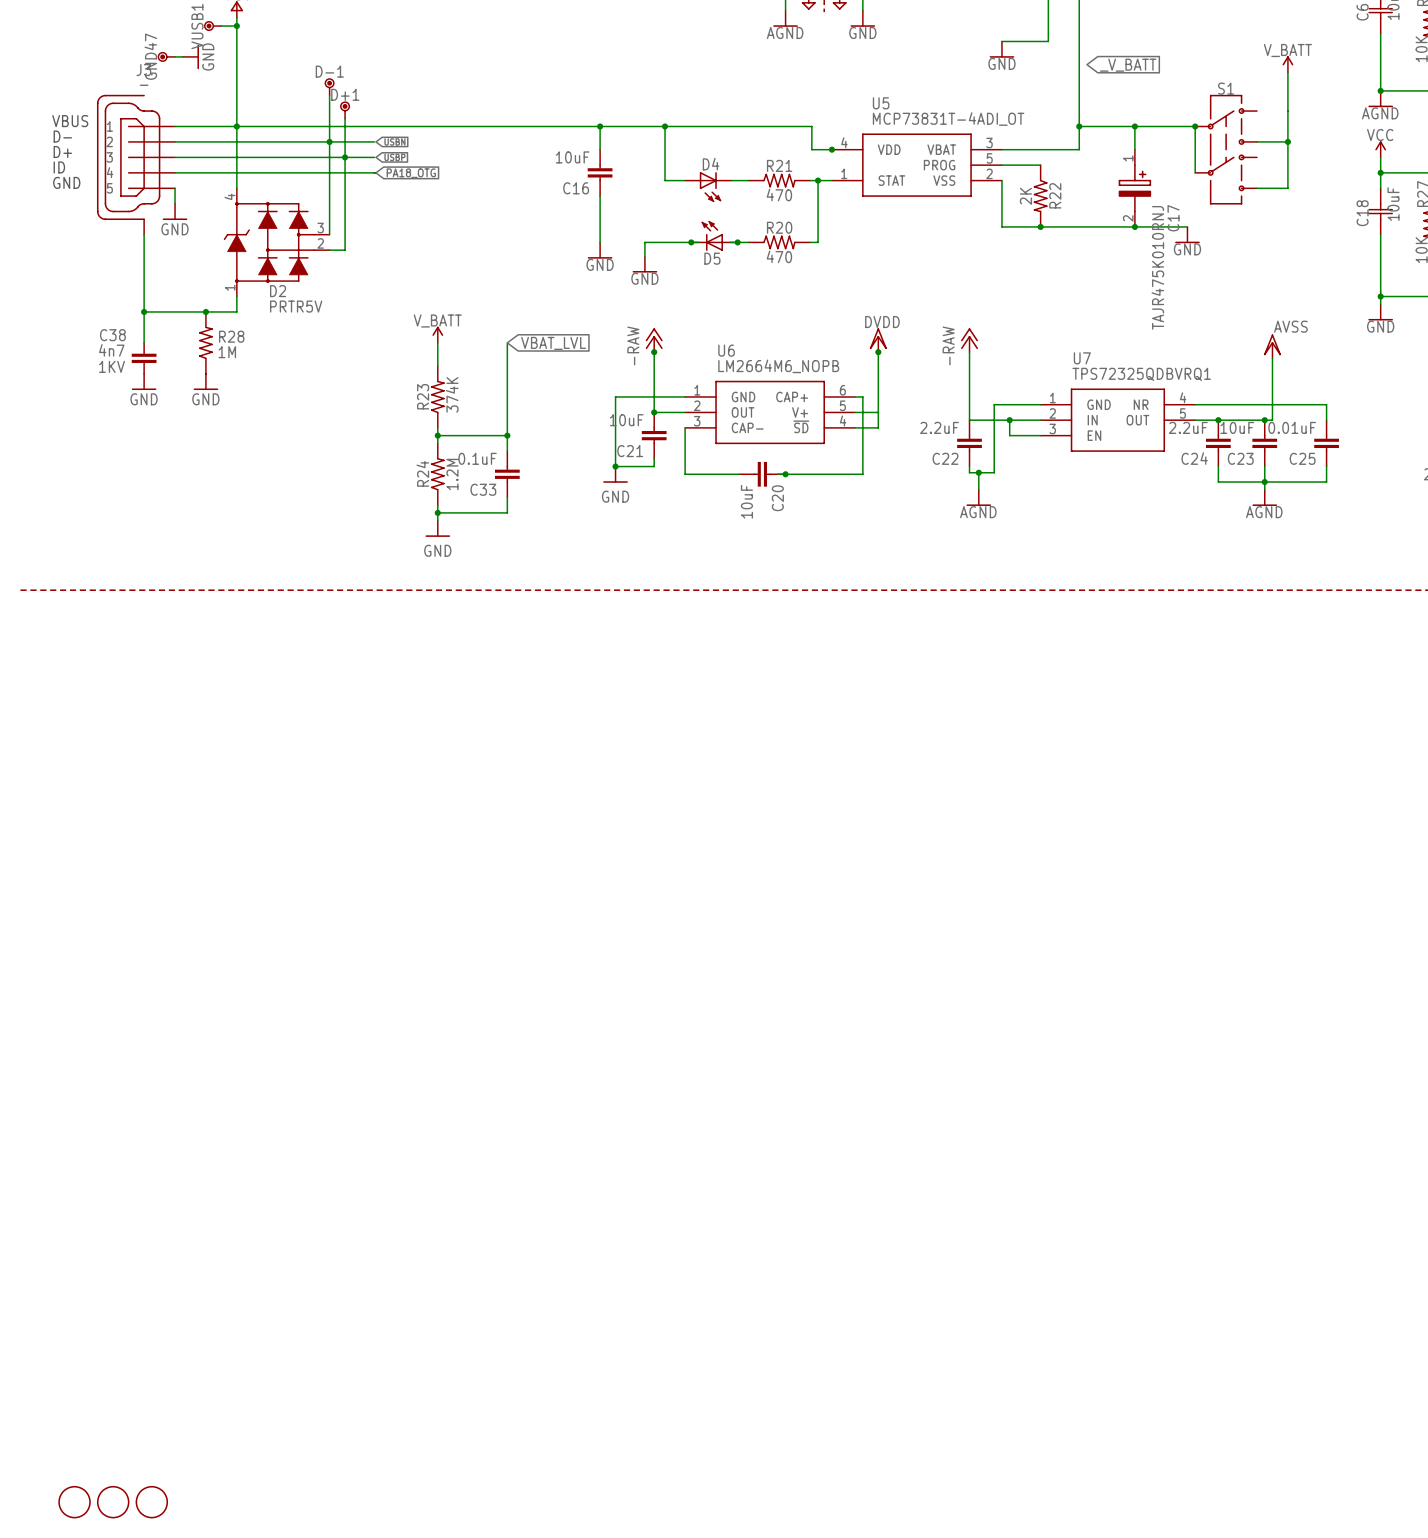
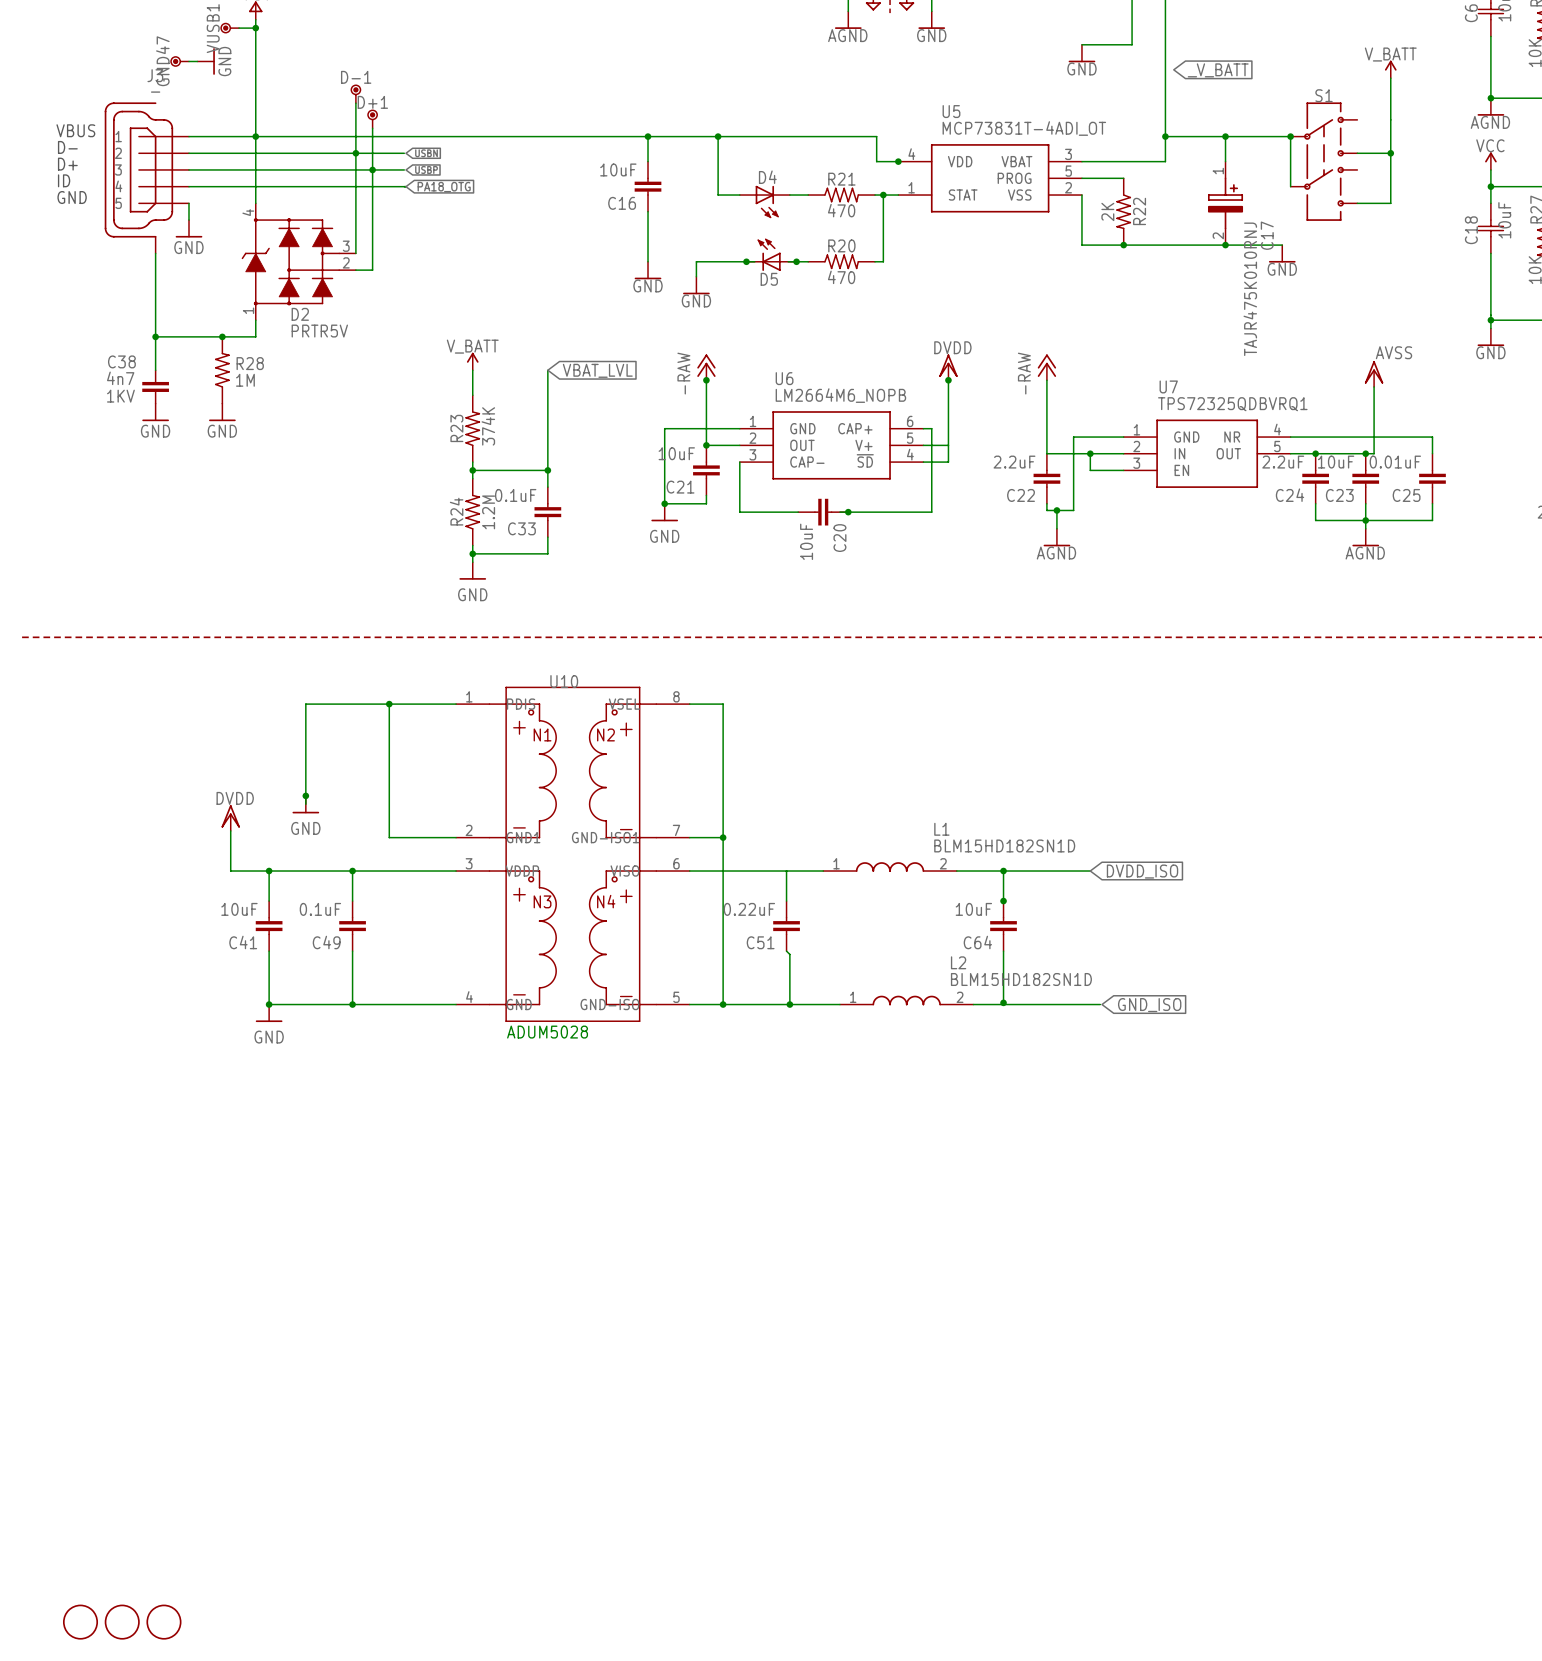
wire: none -> (389, 704) (389, 837) (456, 837)
junction: none -> (389, 704)
wire: none -> (456, 704) (305, 704) (305, 804)
wire: none -> (689, 704) (723, 704) (723, 1004)
junction: none -> (305, 795)
power symbol: none -> GND (305, 804)
power symbol: none -> DVDD (230, 818)
wire: none -> (230, 830) (230, 871) (456, 871)
wire: none -> (689, 837) (723, 837)
junction: none -> (723, 837)
U10: none -> (572, 854)
L1: none -> BLM15HD182SN1D (890, 867)
wire: none -> (269, 871) (269, 901)
junction: none -> (269, 871)
wire: none -> (352, 871) (352, 901)
junction: none -> (352, 871)
wire: none -> (689, 871) (823, 871)
wire: none -> (786, 871) (786, 901)
wire: none -> (956, 871) (1090, 871)
wire: none -> (1003, 871) (1003, 902)
junction: none -> (1003, 871)
global label: none -> DVDD_ISO (1142, 871)
junction: none -> (1003, 901)
C41: none -> 10uF (269, 926)
C49: none -> 0.1uF (352, 926)
C51: none -> 0.22uF (786, 926)
C64: none -> 10uF (1003, 926)
wire: none -> (269, 951) (269, 1004) (456, 1004)
wire: none -> (352, 951) (352, 1004)
wire: none -> (786, 951) (789, 954) (789, 1004)
wire: none -> (1003, 951) (1003, 1004)
L2: none -> BLM15HD182SN1D (906, 1000)
junction: none -> (1003, 1002)
junction: none -> (269, 1004)
junction: none -> (352, 1004)
wire: none -> (689, 1004) (839, 1004)
junction: none -> (723, 1004)
junction: none -> (789, 1004)
wire: none -> (973, 1004) (1100, 1004)
global label: none -> GND_ISO (1149, 1005)
power symbol: none -> GND (269, 1013)
text: none -> ADUM5028 (547, 1032)

